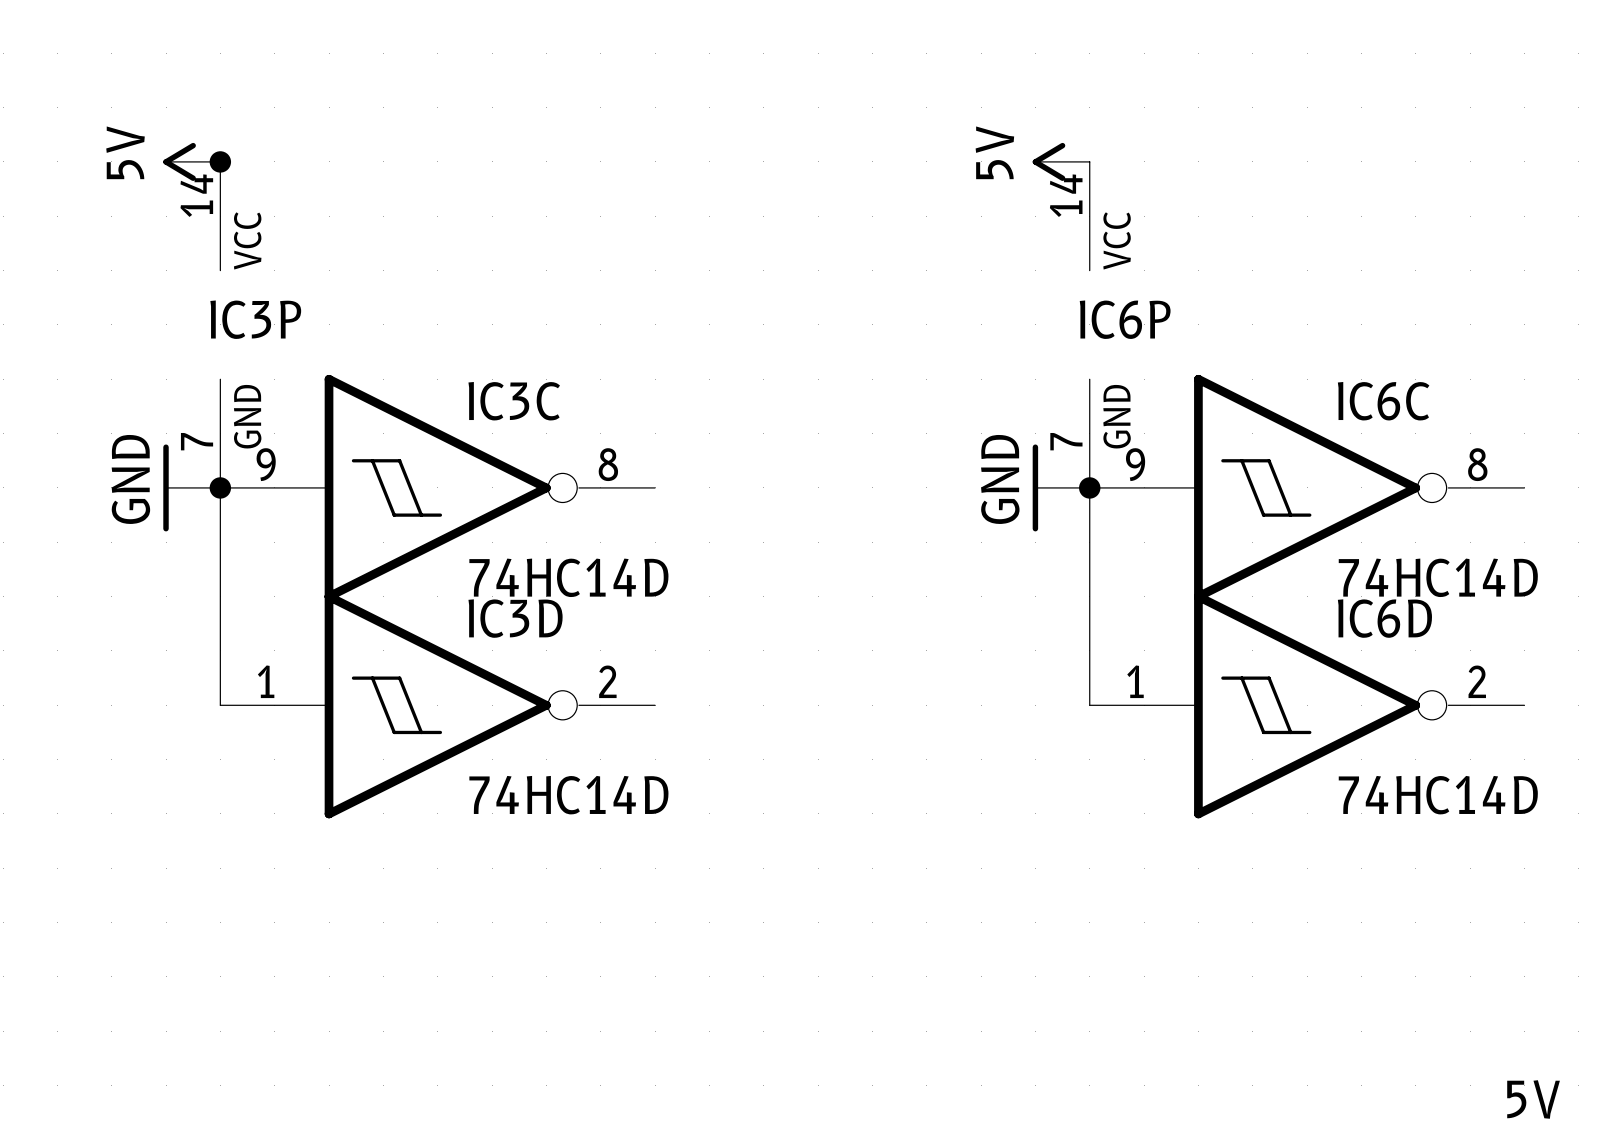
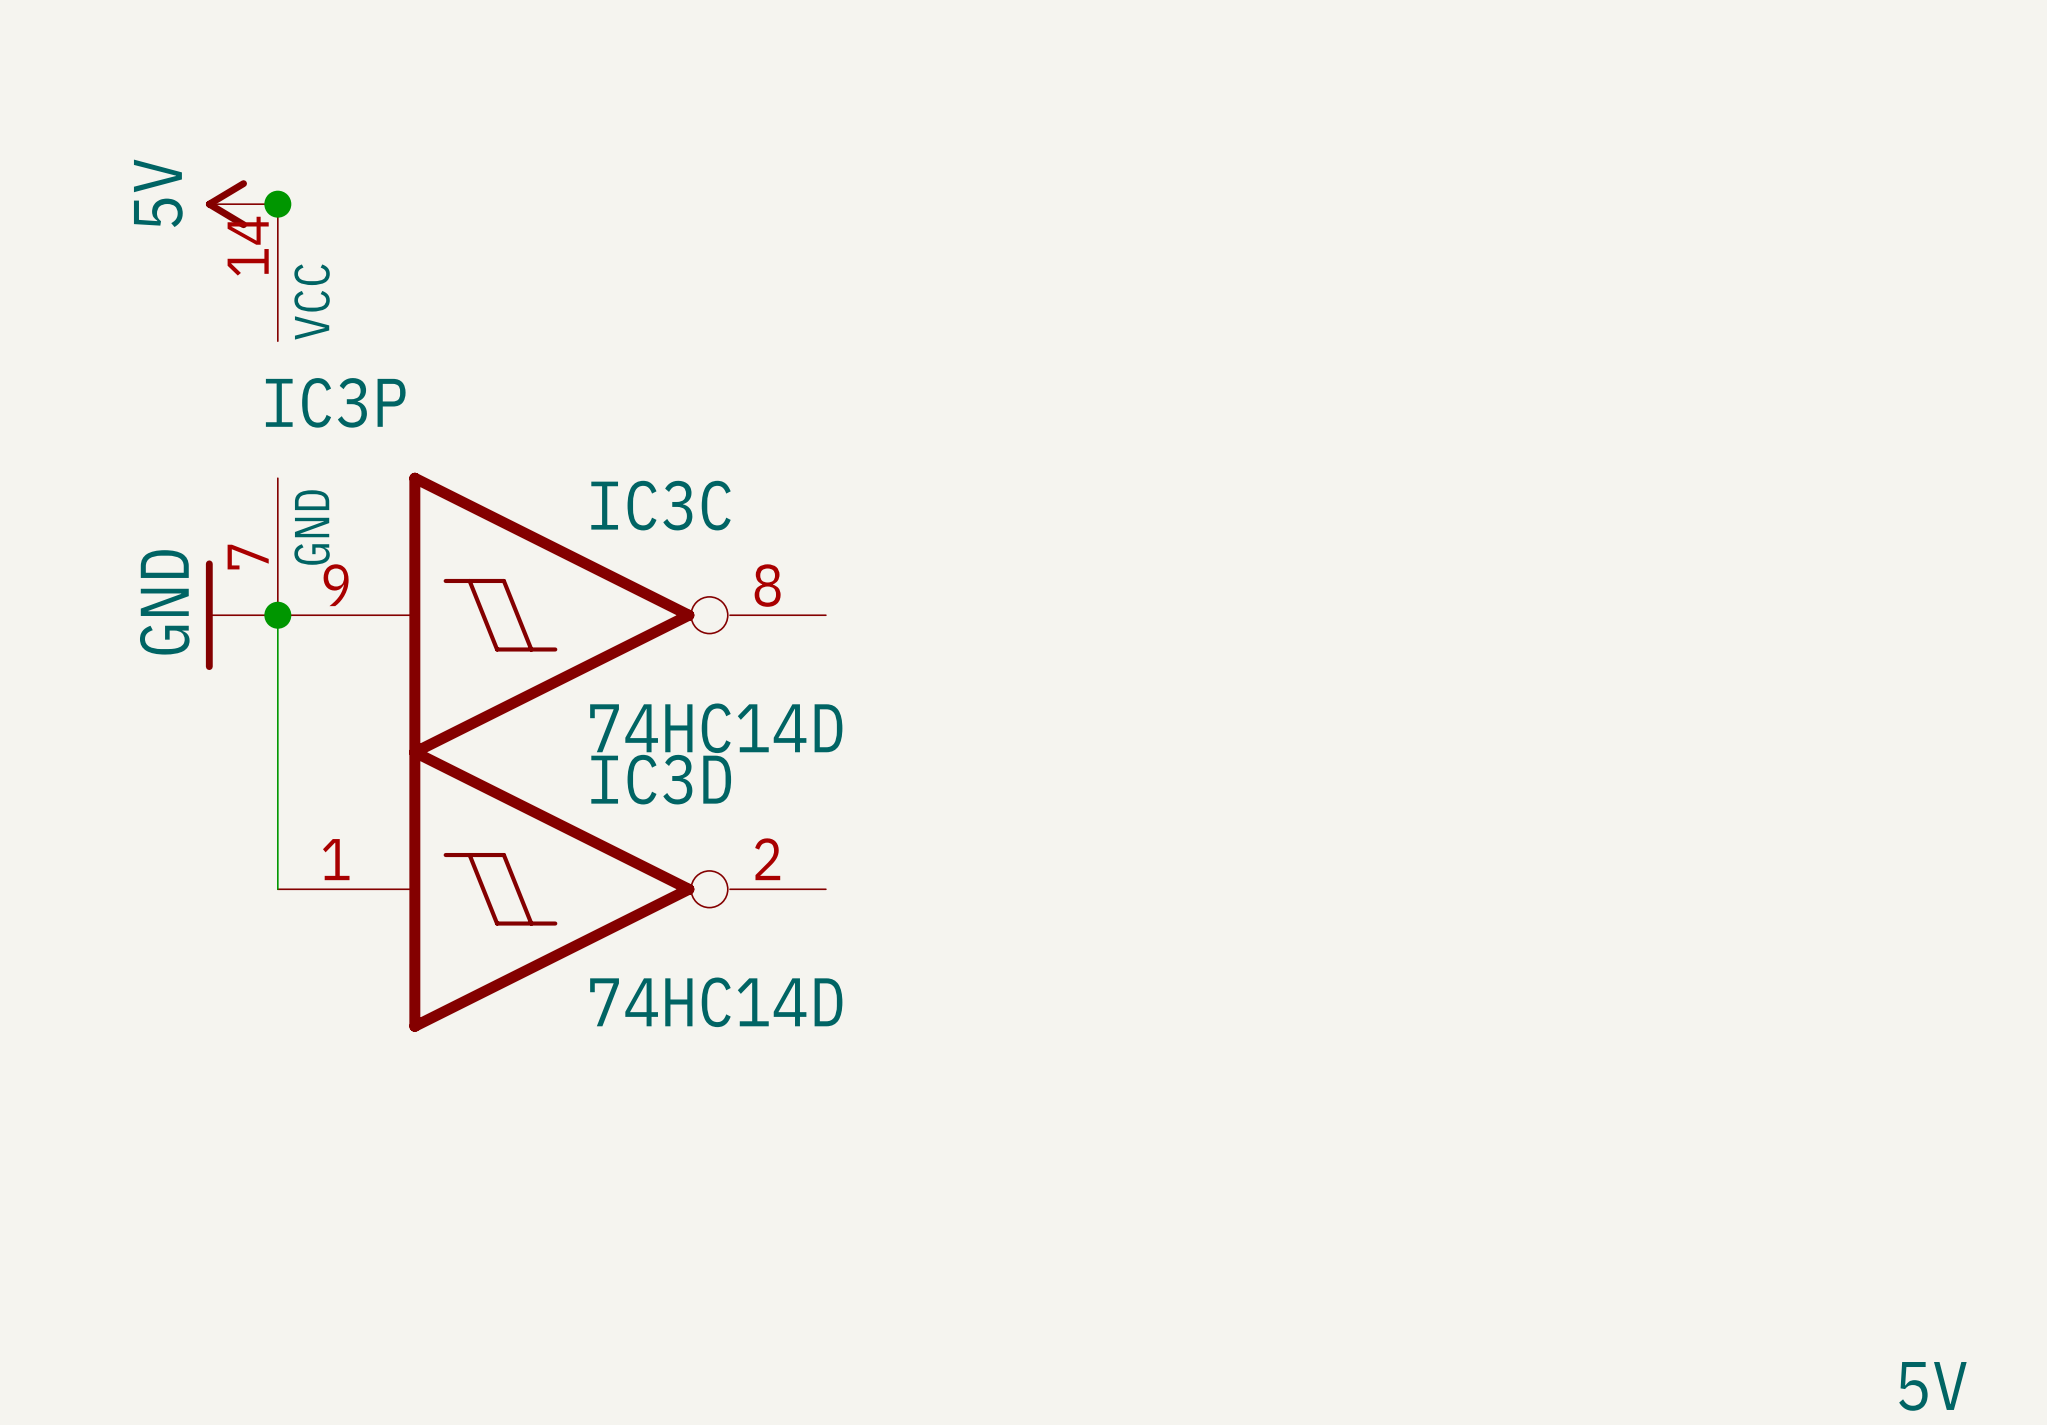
power symbol: 5V (1061, 161) -> none
IC6P: (1089, 324) -> none
power symbol: GND (1061, 487) -> none
wire: (1089, 487) (1089, 705) -> none
junction: (1089, 487) -> none
IC6C: 74HC14D (1307, 487) -> none
IC6D: 74HC14D (1307, 705) -> none

